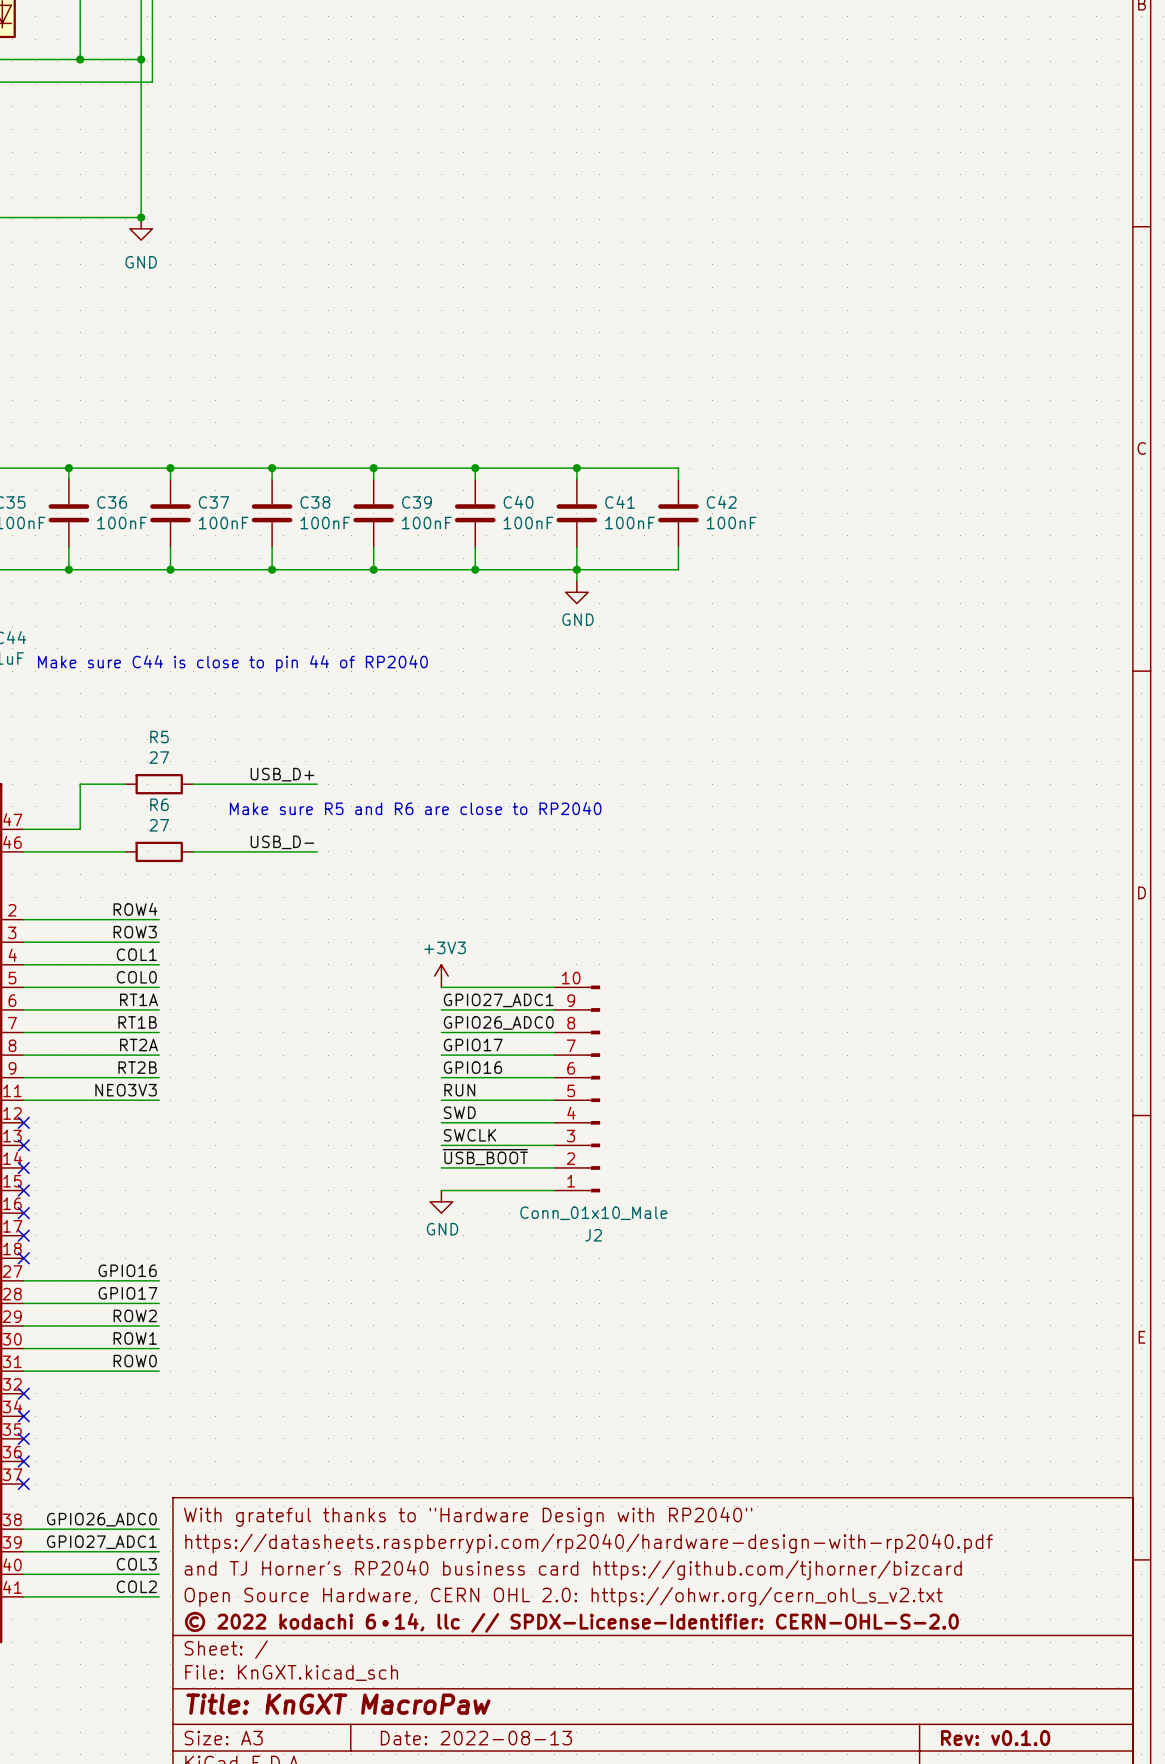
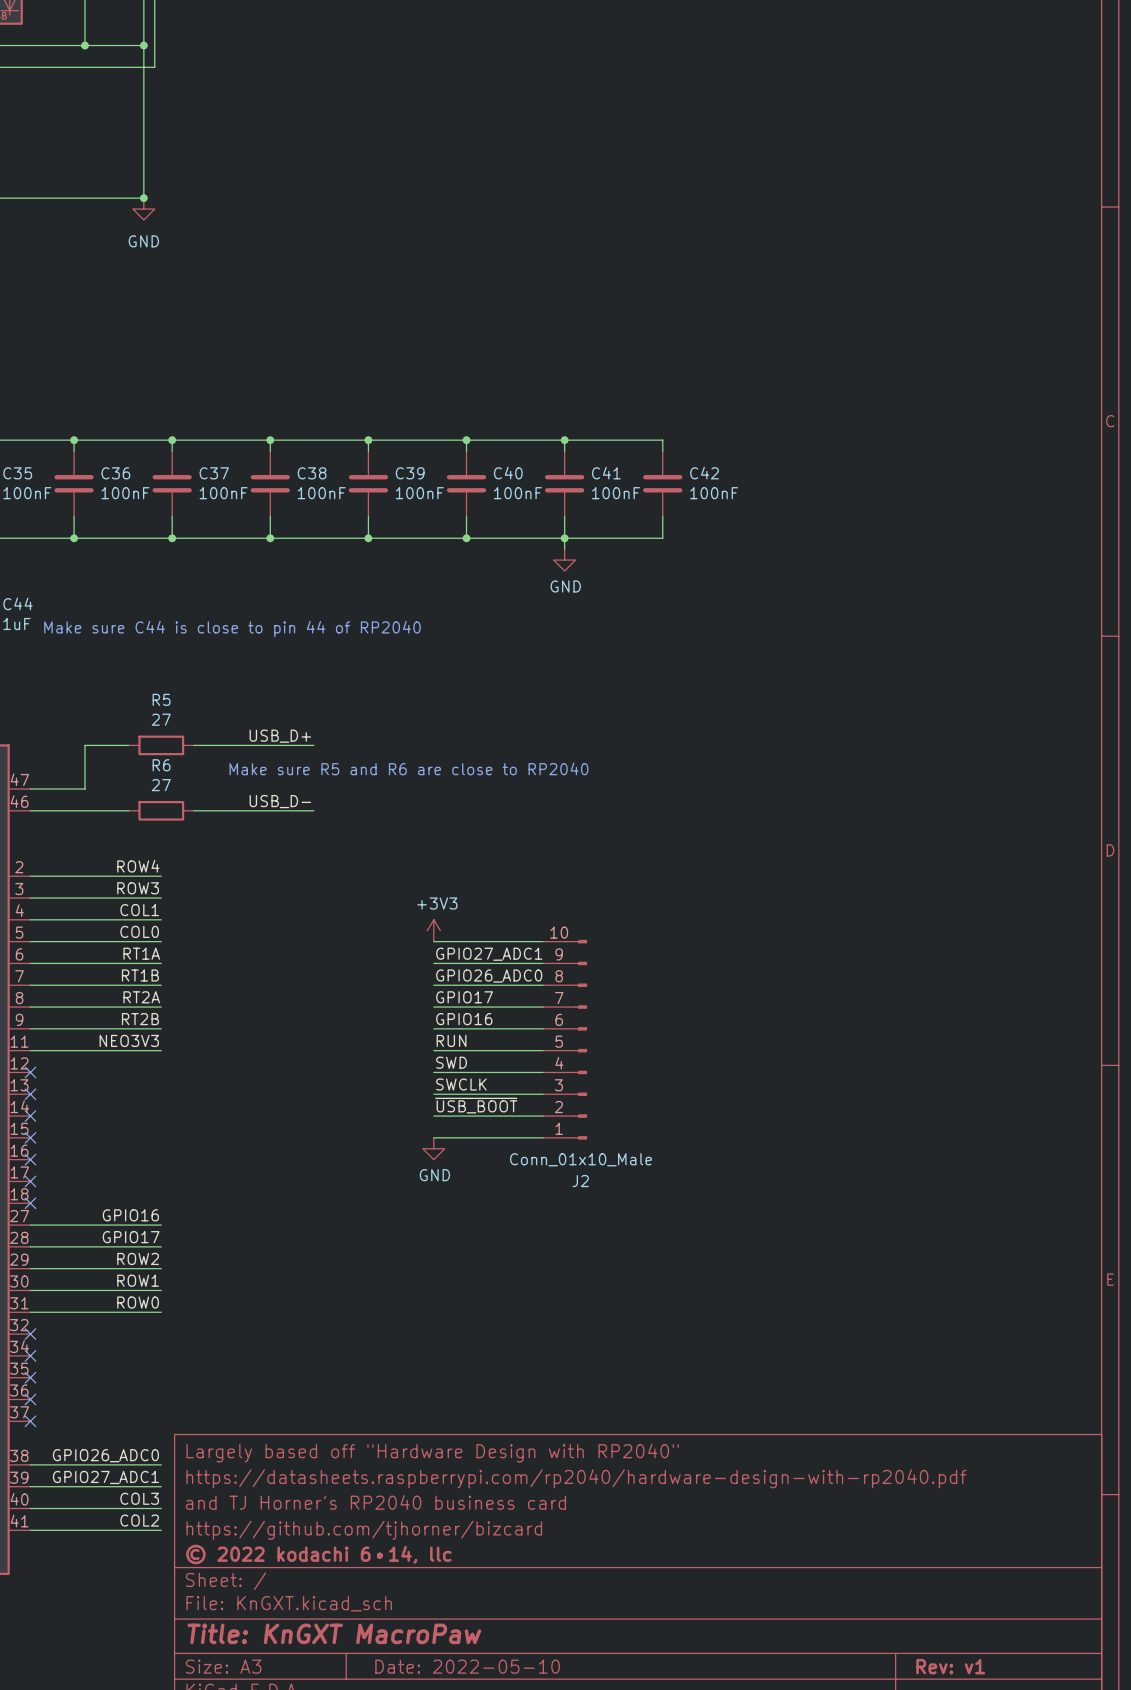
title block: With grateful thanks to "Hardware Design with RP2040" (468, 1516) -> Largely based off "Hardware Design with RP2040" (432, 1453)
title block: and TJ Horner's RP2040 business card https://github.com/tjhorner/bizcard (573, 1570) -> and TJ Horner's RP2040 business card (375, 1502)
title block: Open Source Hardware, CERN OHL 2.0: https://ohwr.org/cern_ohl_s_v2.txt (563, 1596) -> https://github.com/tjhorner/bizcard (364, 1530)
title block: © 2022 kodachi 6•14, llc // SPDX-License-Identifier: CERN-OHL-S-2.0 (571, 1622) -> © 2022 kodachi 6•14, llc (318, 1554)
title block: Date: 2022-08-13 (476, 1738) -> Date: 2022-05-10 (467, 1666)
title block: Rev: v0.1.0 (995, 1738) -> Rev: v1 (950, 1666)

